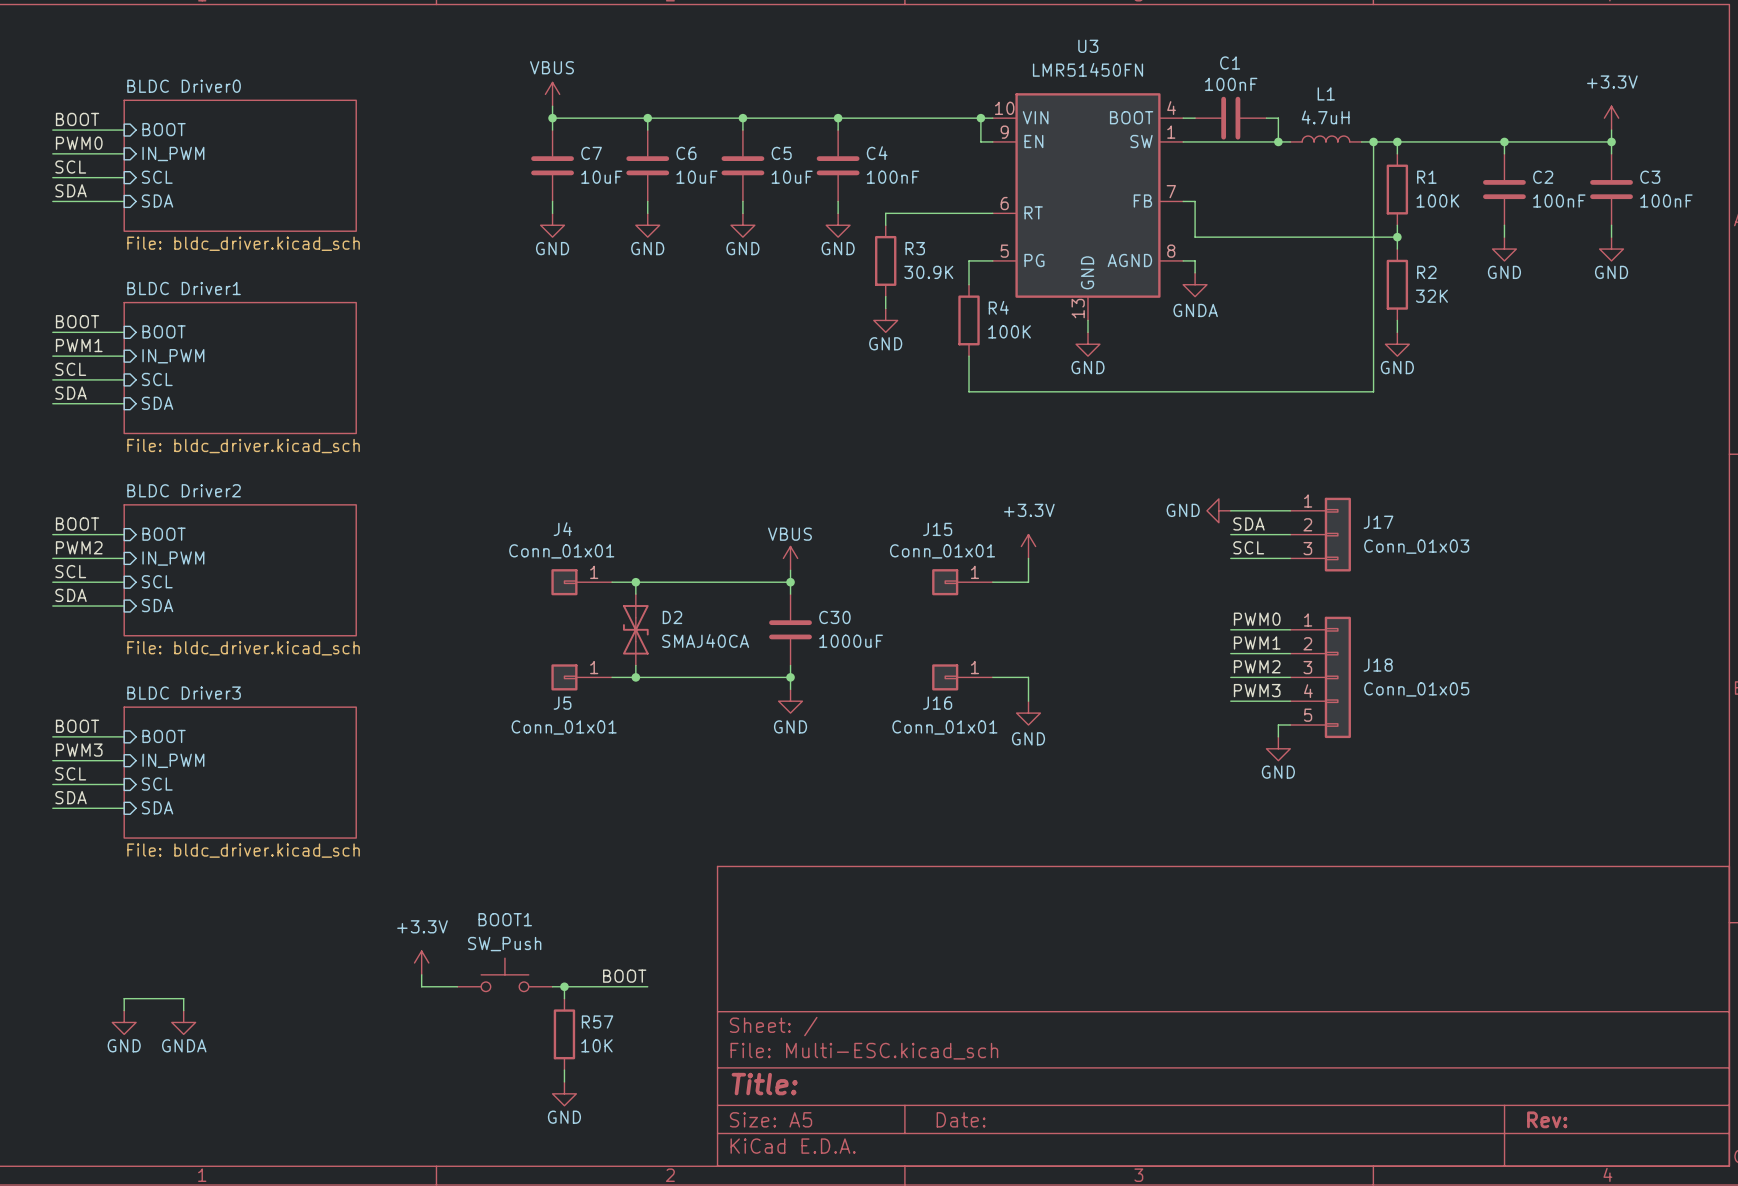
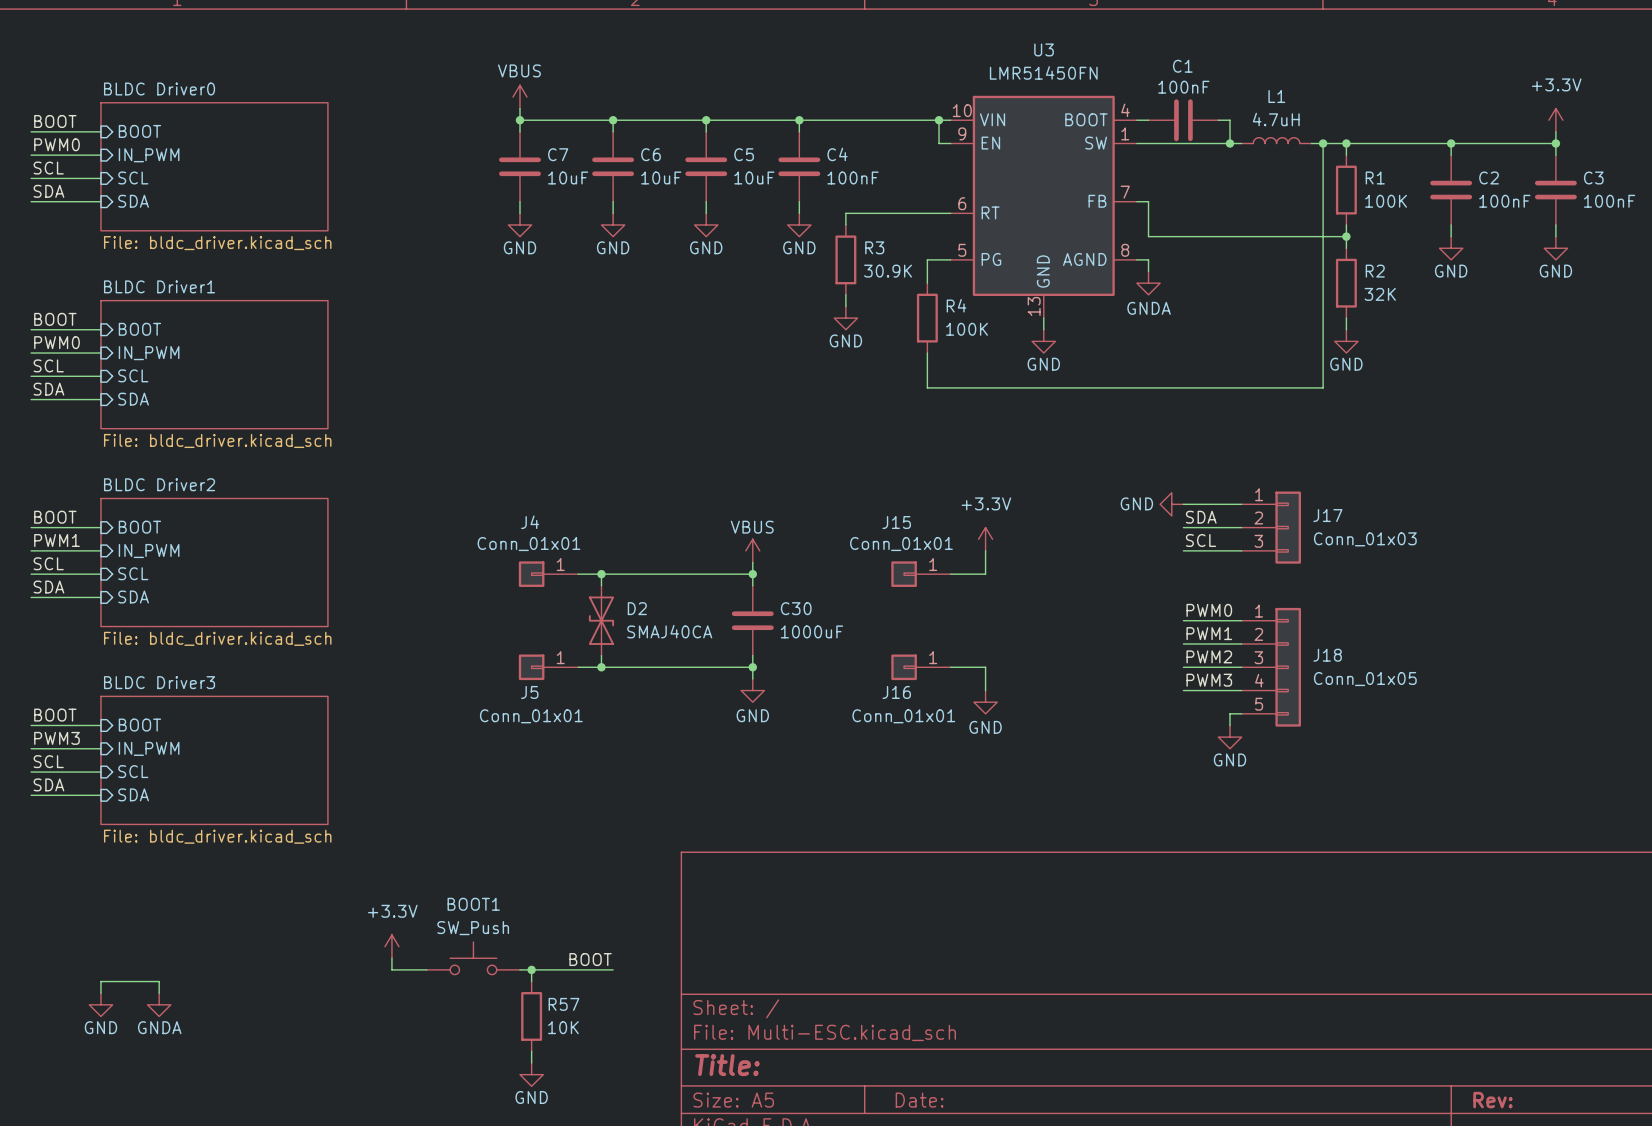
label: PWM1 (79, 345) -> PWM0 (56, 342)
label: PWM2 (79, 547) -> PWM1 (56, 540)

